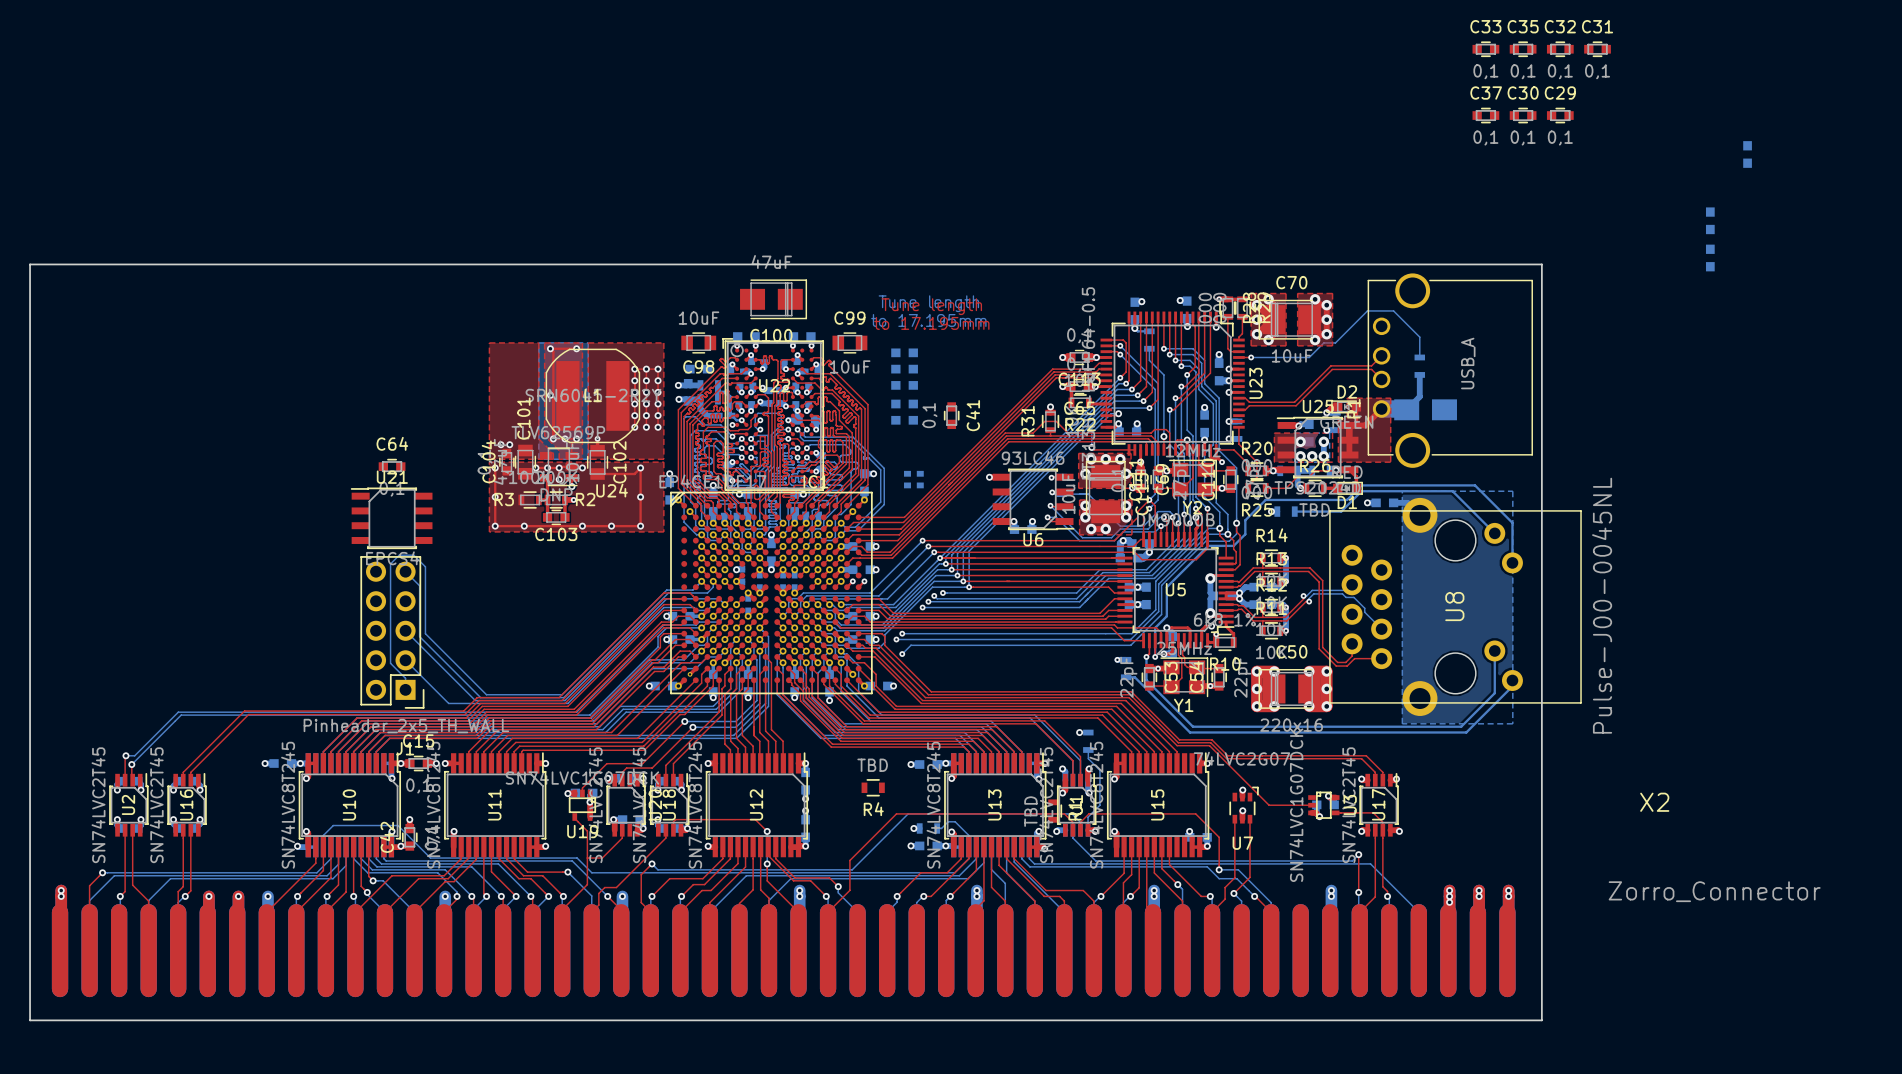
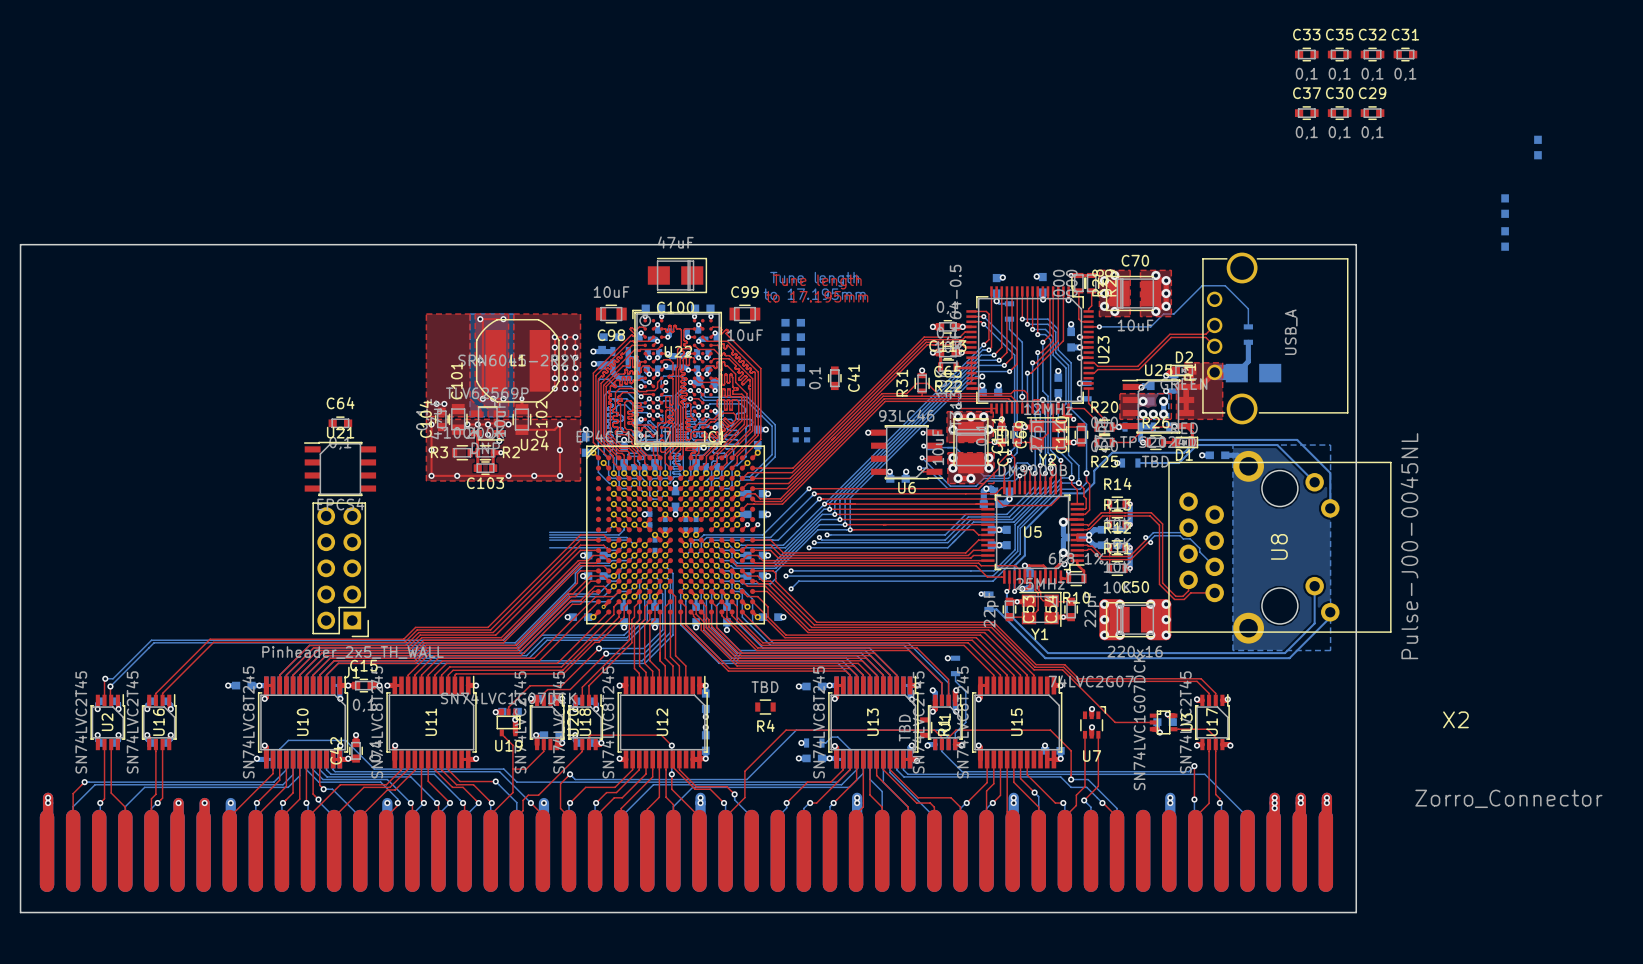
bottom track: (405, 571) (419, 585) (419, 636) (480, 697) (563, 697) (668, 592) -> (549, 534) (584, 534)
bottom track: (666, 590) (562, 694) (486, 694) (425, 633) (425, 566) (413, 555) (399, 555) (390, 563) (390, 663) (405, 678) (405, 689) -> (583, 532) (549, 532)
bottom track: none -> (549, 537) (626, 537) (629, 540)
bottom track: (666, 598) (565, 700) (475, 700) (405, 630) -> (583, 540) (549, 540)
bottom track: (663, 607) (567, 703) (448, 703) (405, 660) -> (580, 547) (549, 547)

